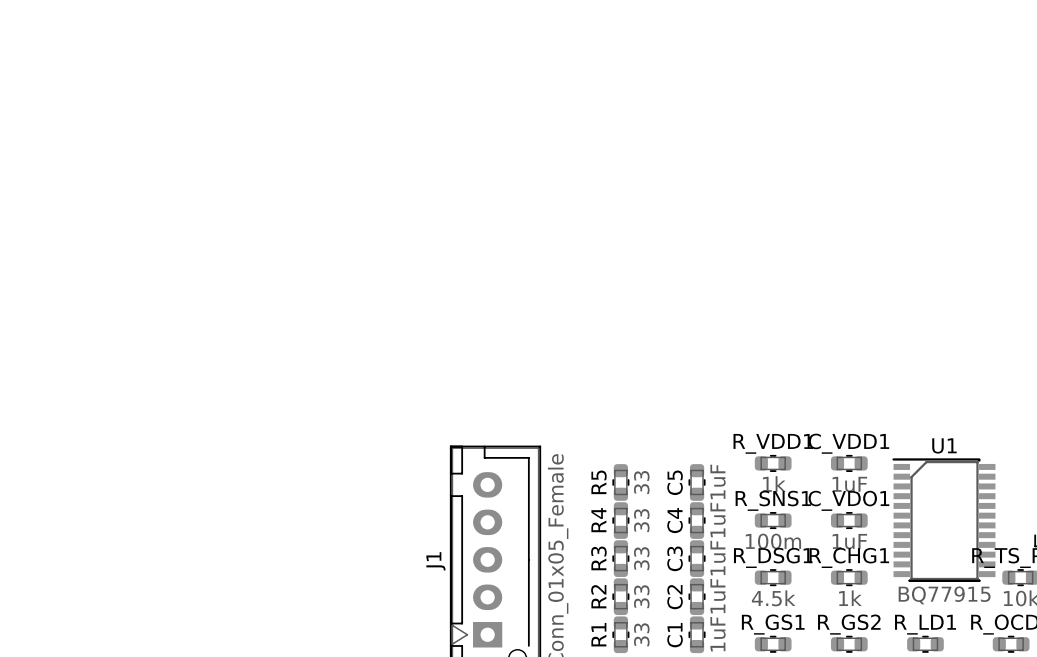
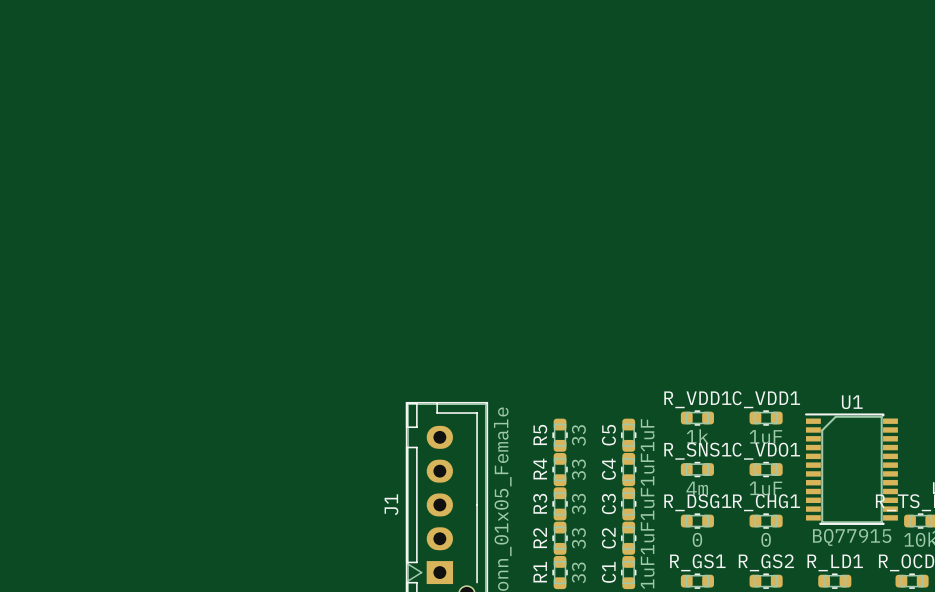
R_SNS1 value: 100m (773, 541) -> 4m (697, 488)
R_DSG1 value: 4.5k (773, 598) -> 0 (697, 539)
R_CHG1 value: 1k (850, 598) -> 0 (766, 539)

